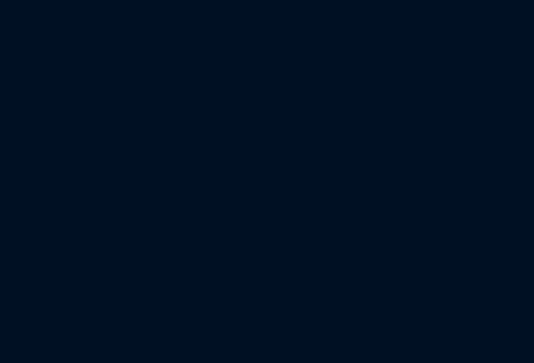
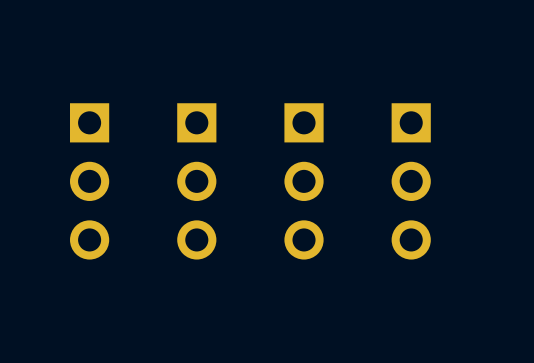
part: none -> (89, 181)
part: none -> (196, 181)
part: none -> (304, 181)
part: none -> (411, 181)

